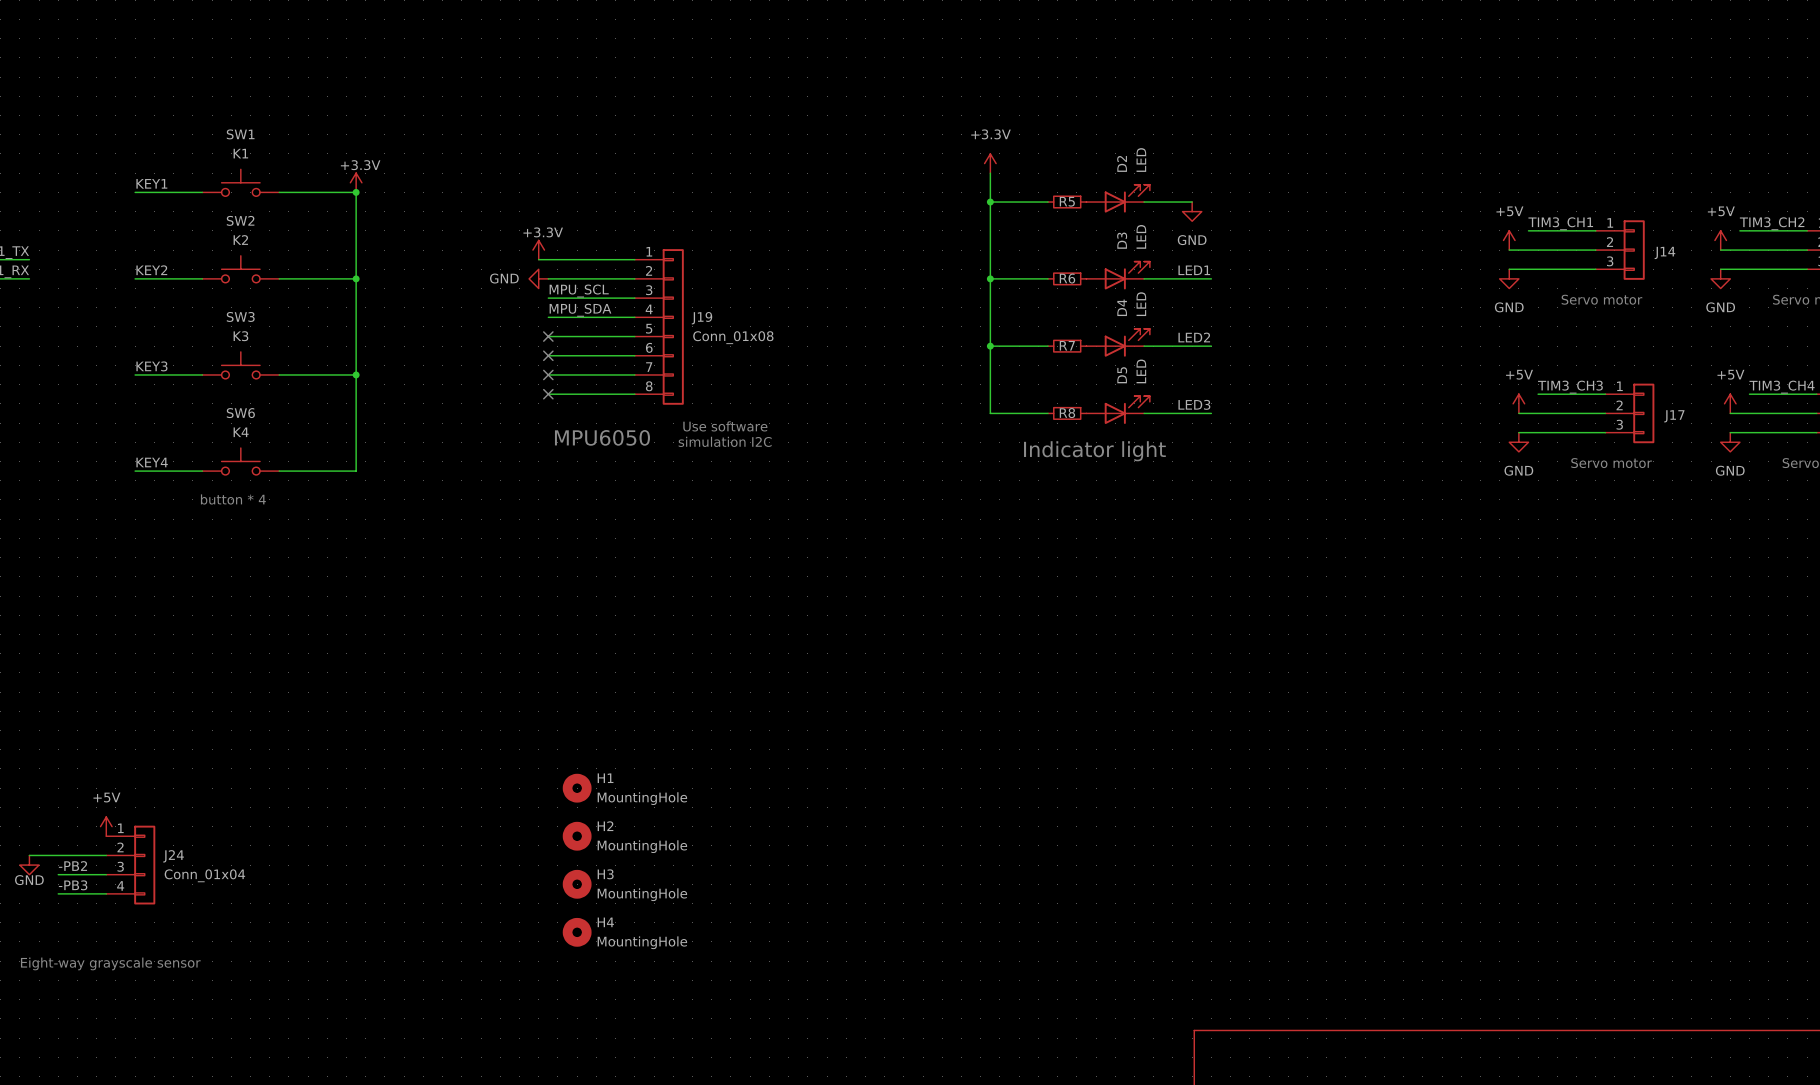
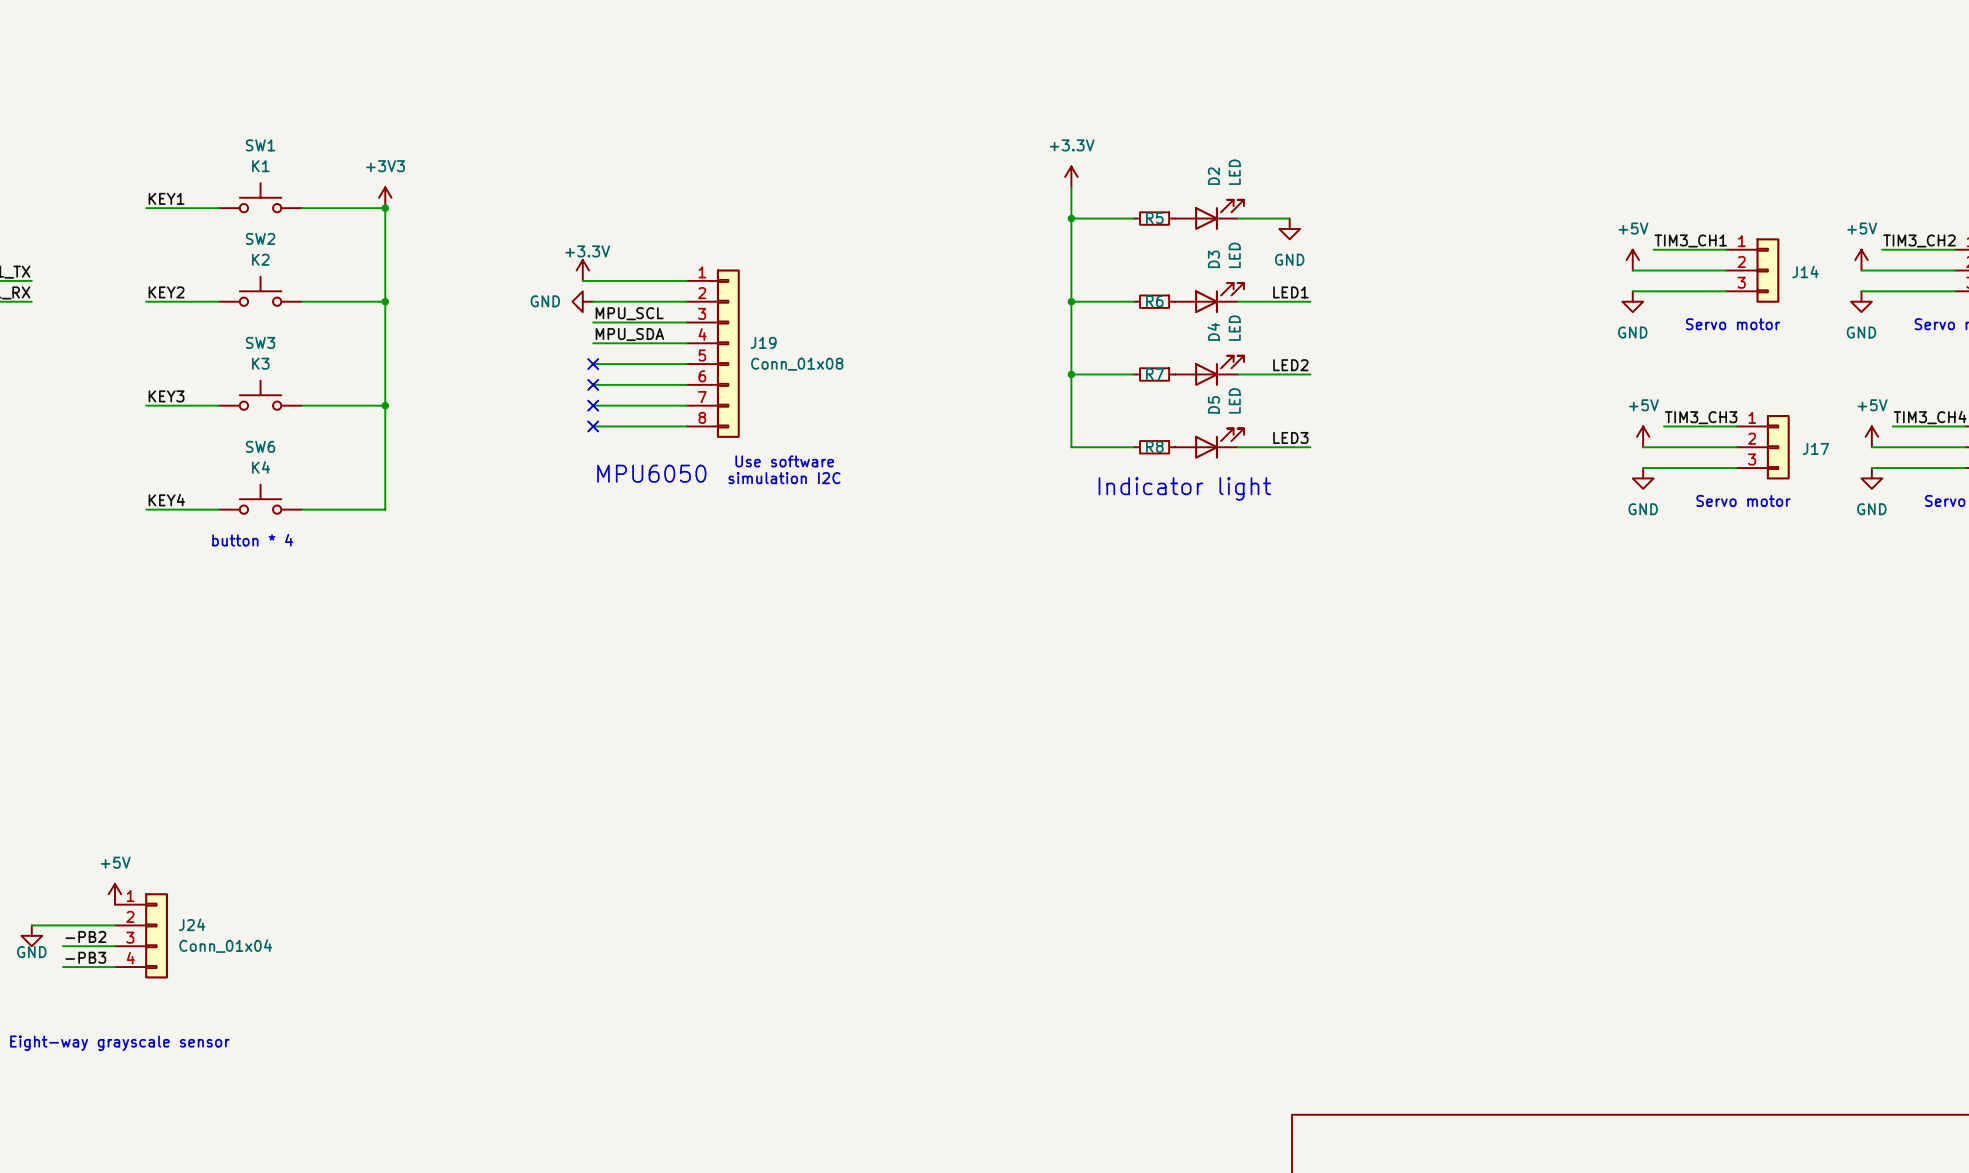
power symbol: +3.3V (356, 182) -> +3V3 (385, 197)
H1: MountingHole (577, 788) -> none
H2: MountingHole (577, 836) -> none
H3: MountingHole (577, 884) -> none
H4: MountingHole (577, 932) -> none

